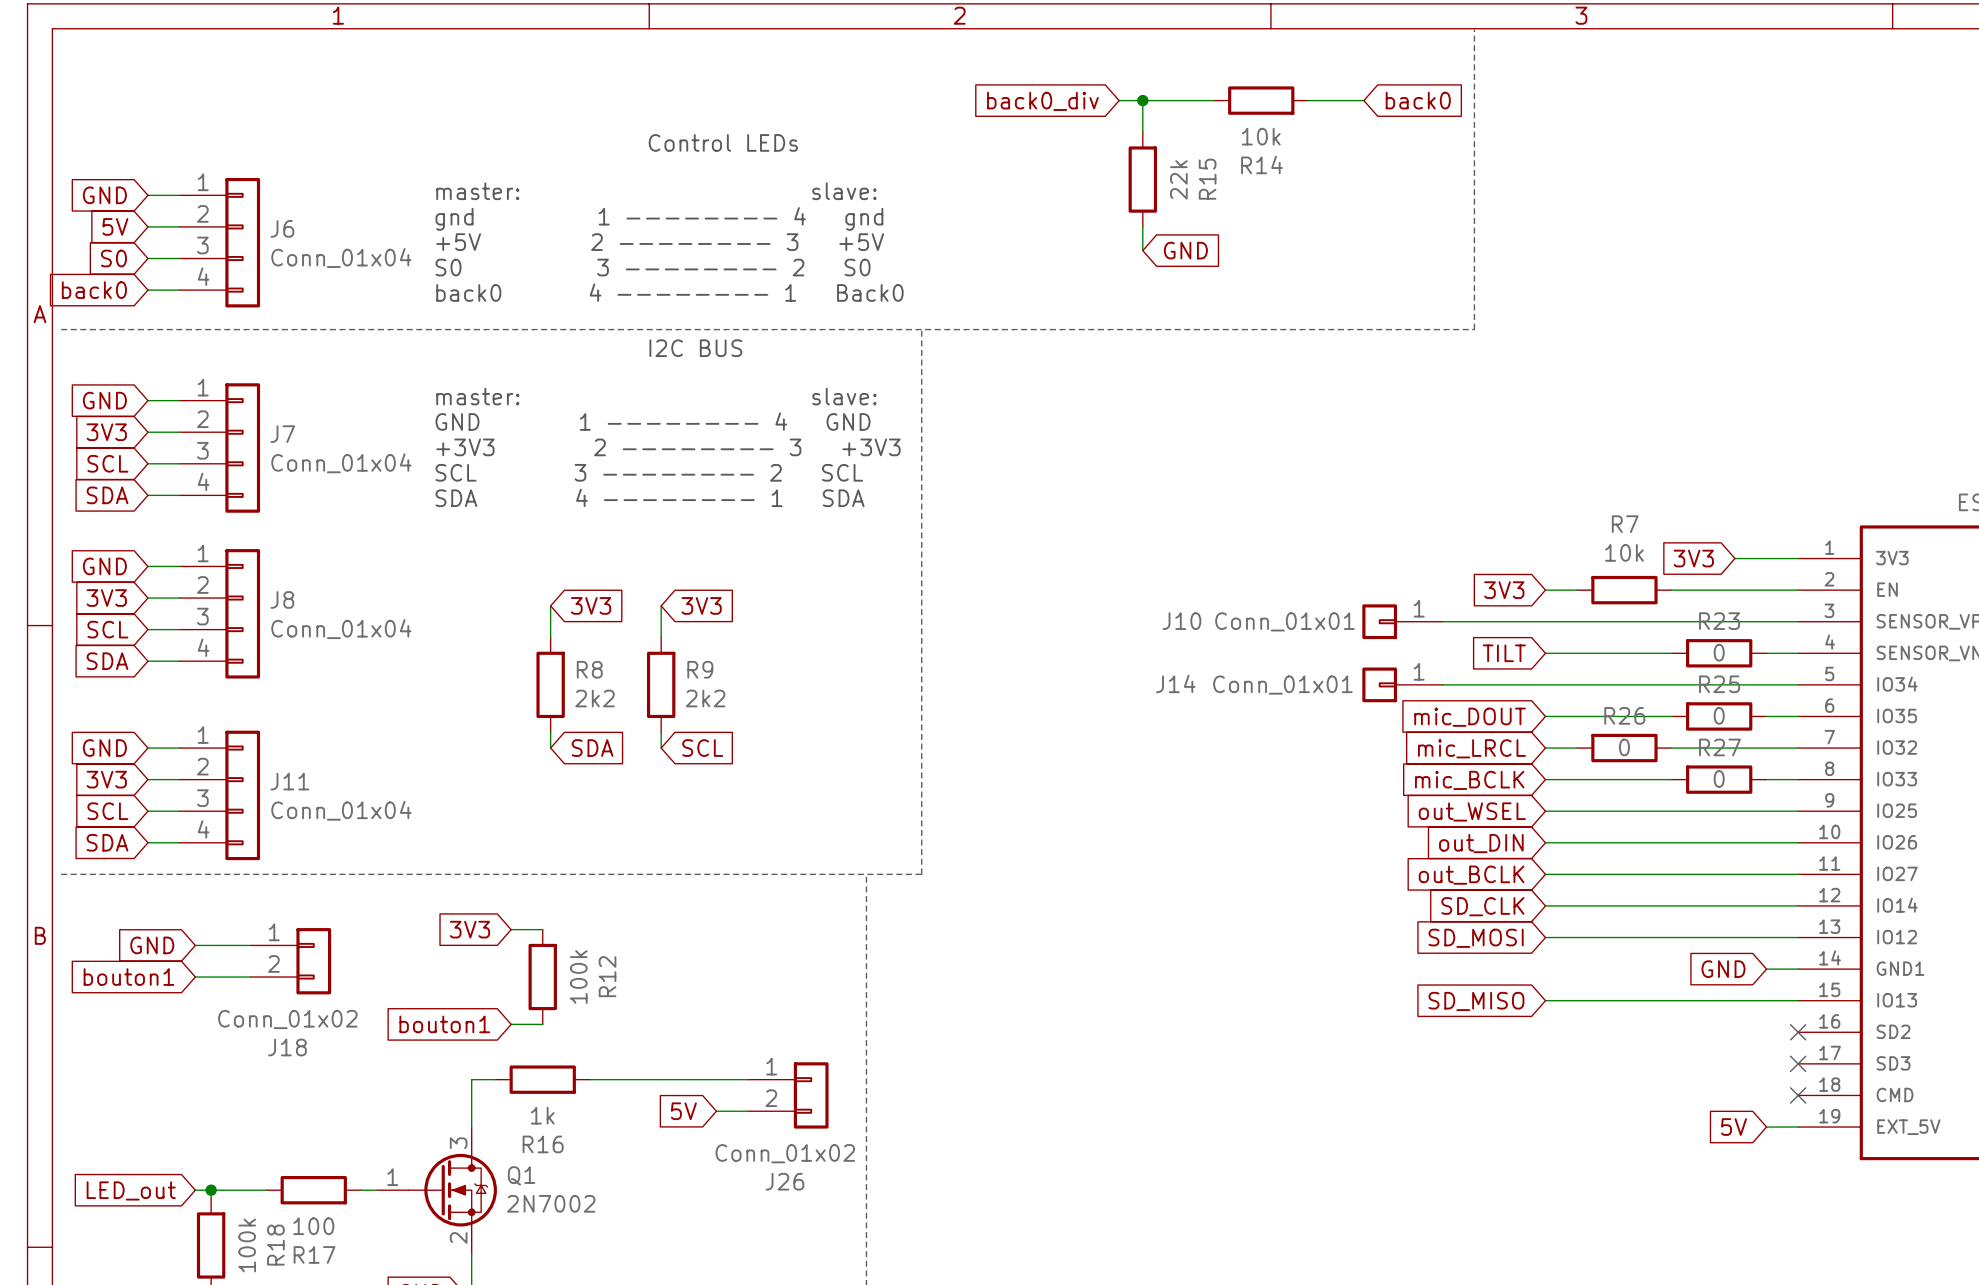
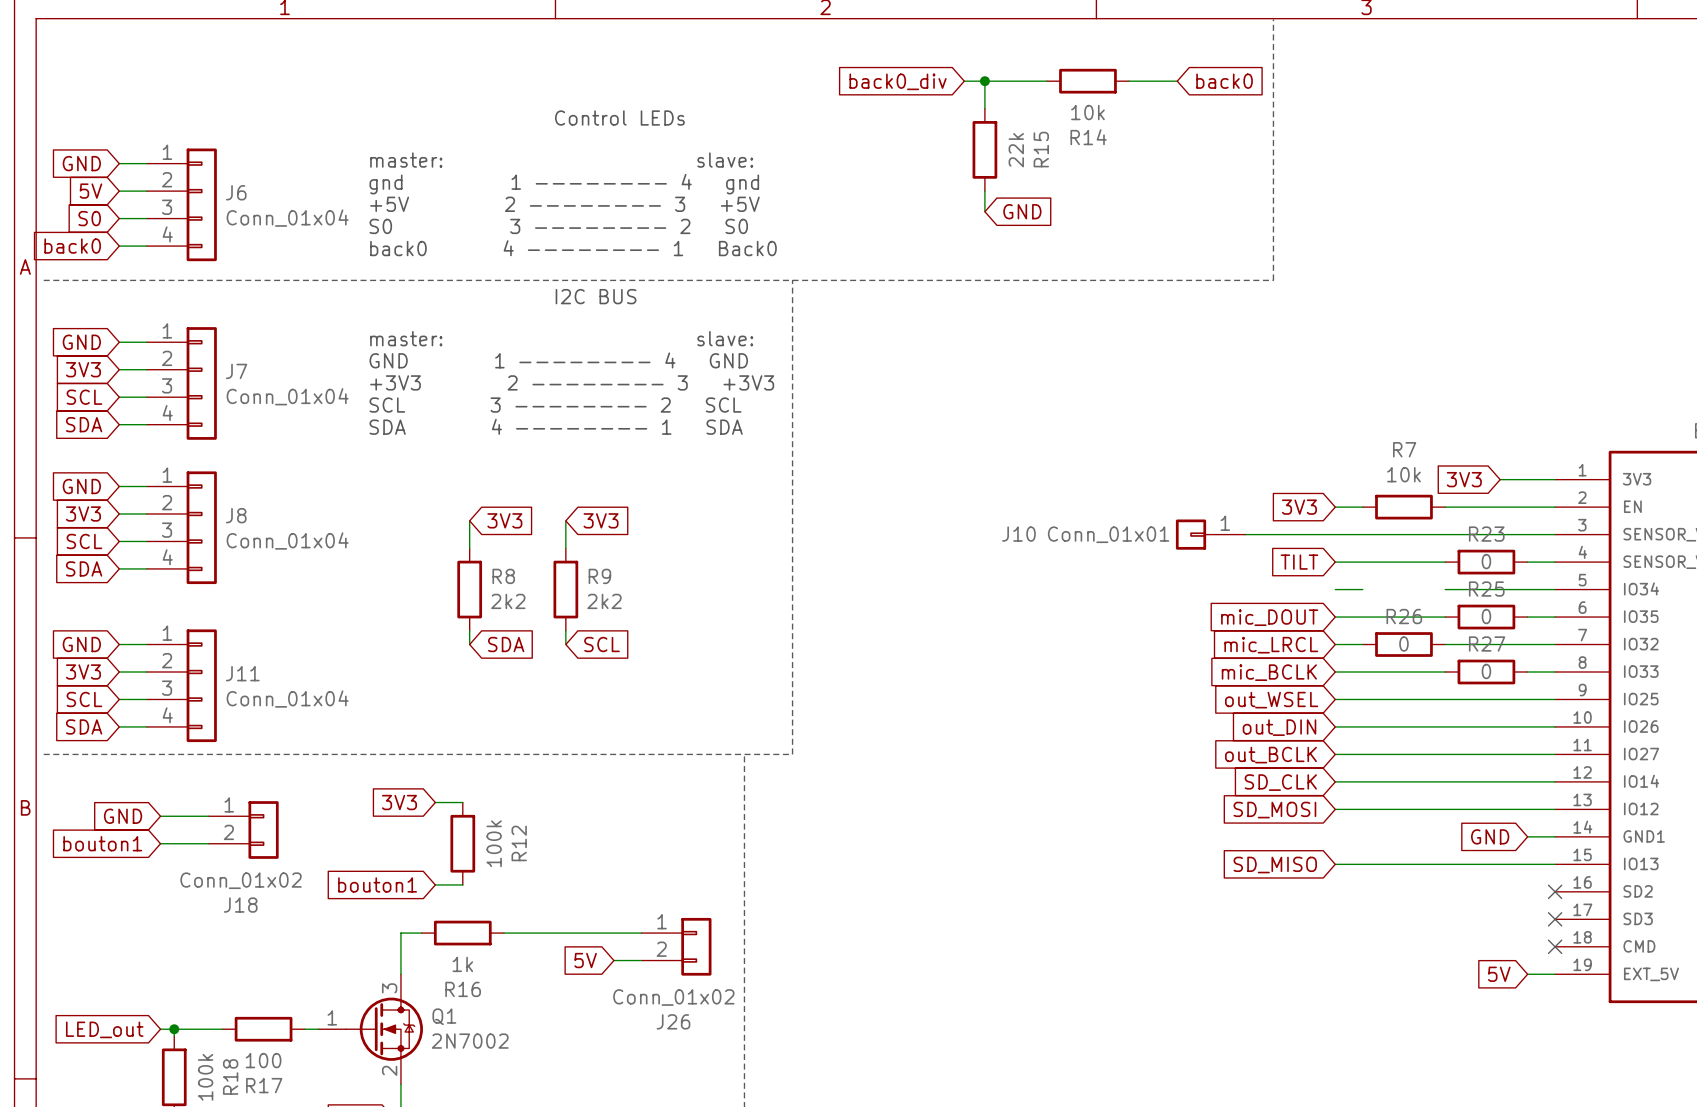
J14: Conn_01x01 (1402, 684) -> none
wire: (1442, 684) (1545, 684) -> none
wire: (1577, 684) (1671, 684) -> none

